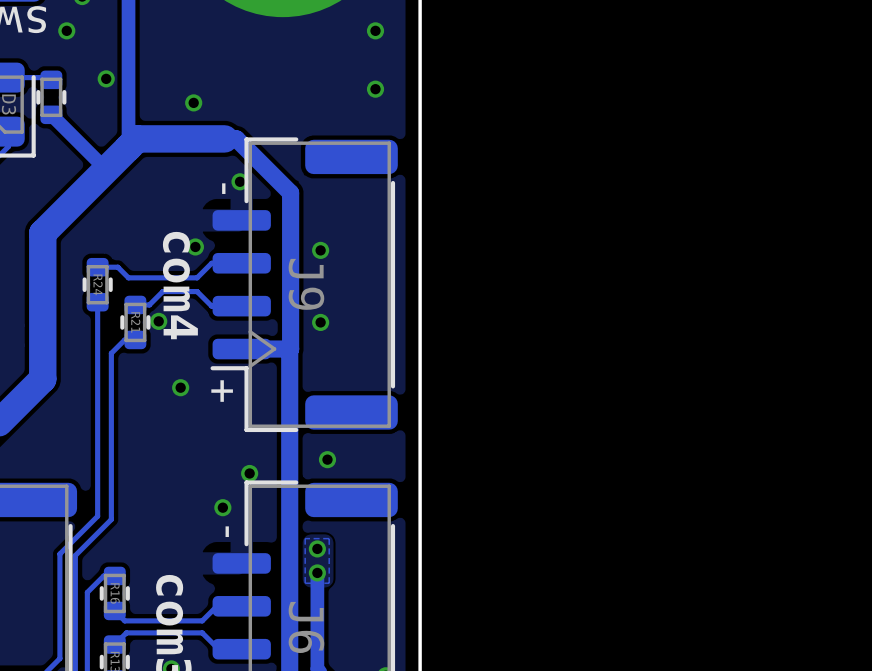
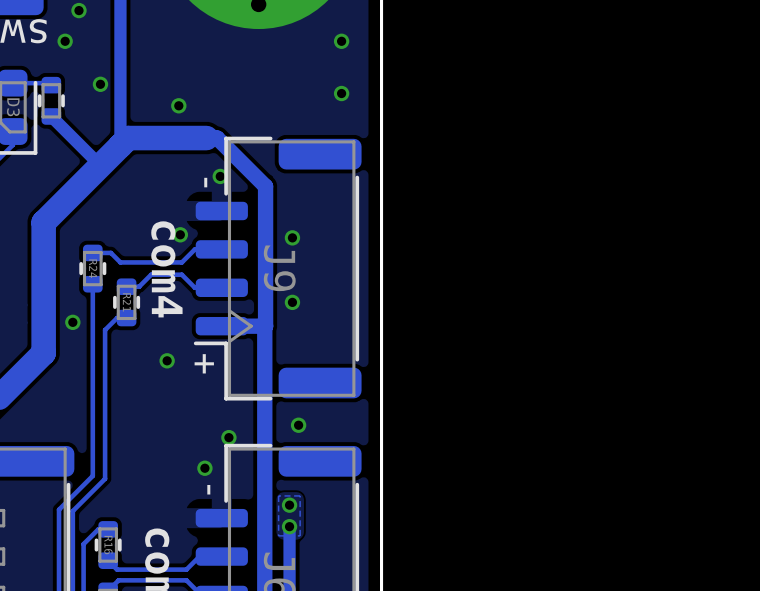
via: (158, 321) -> none
via: none -> (72, 322)

